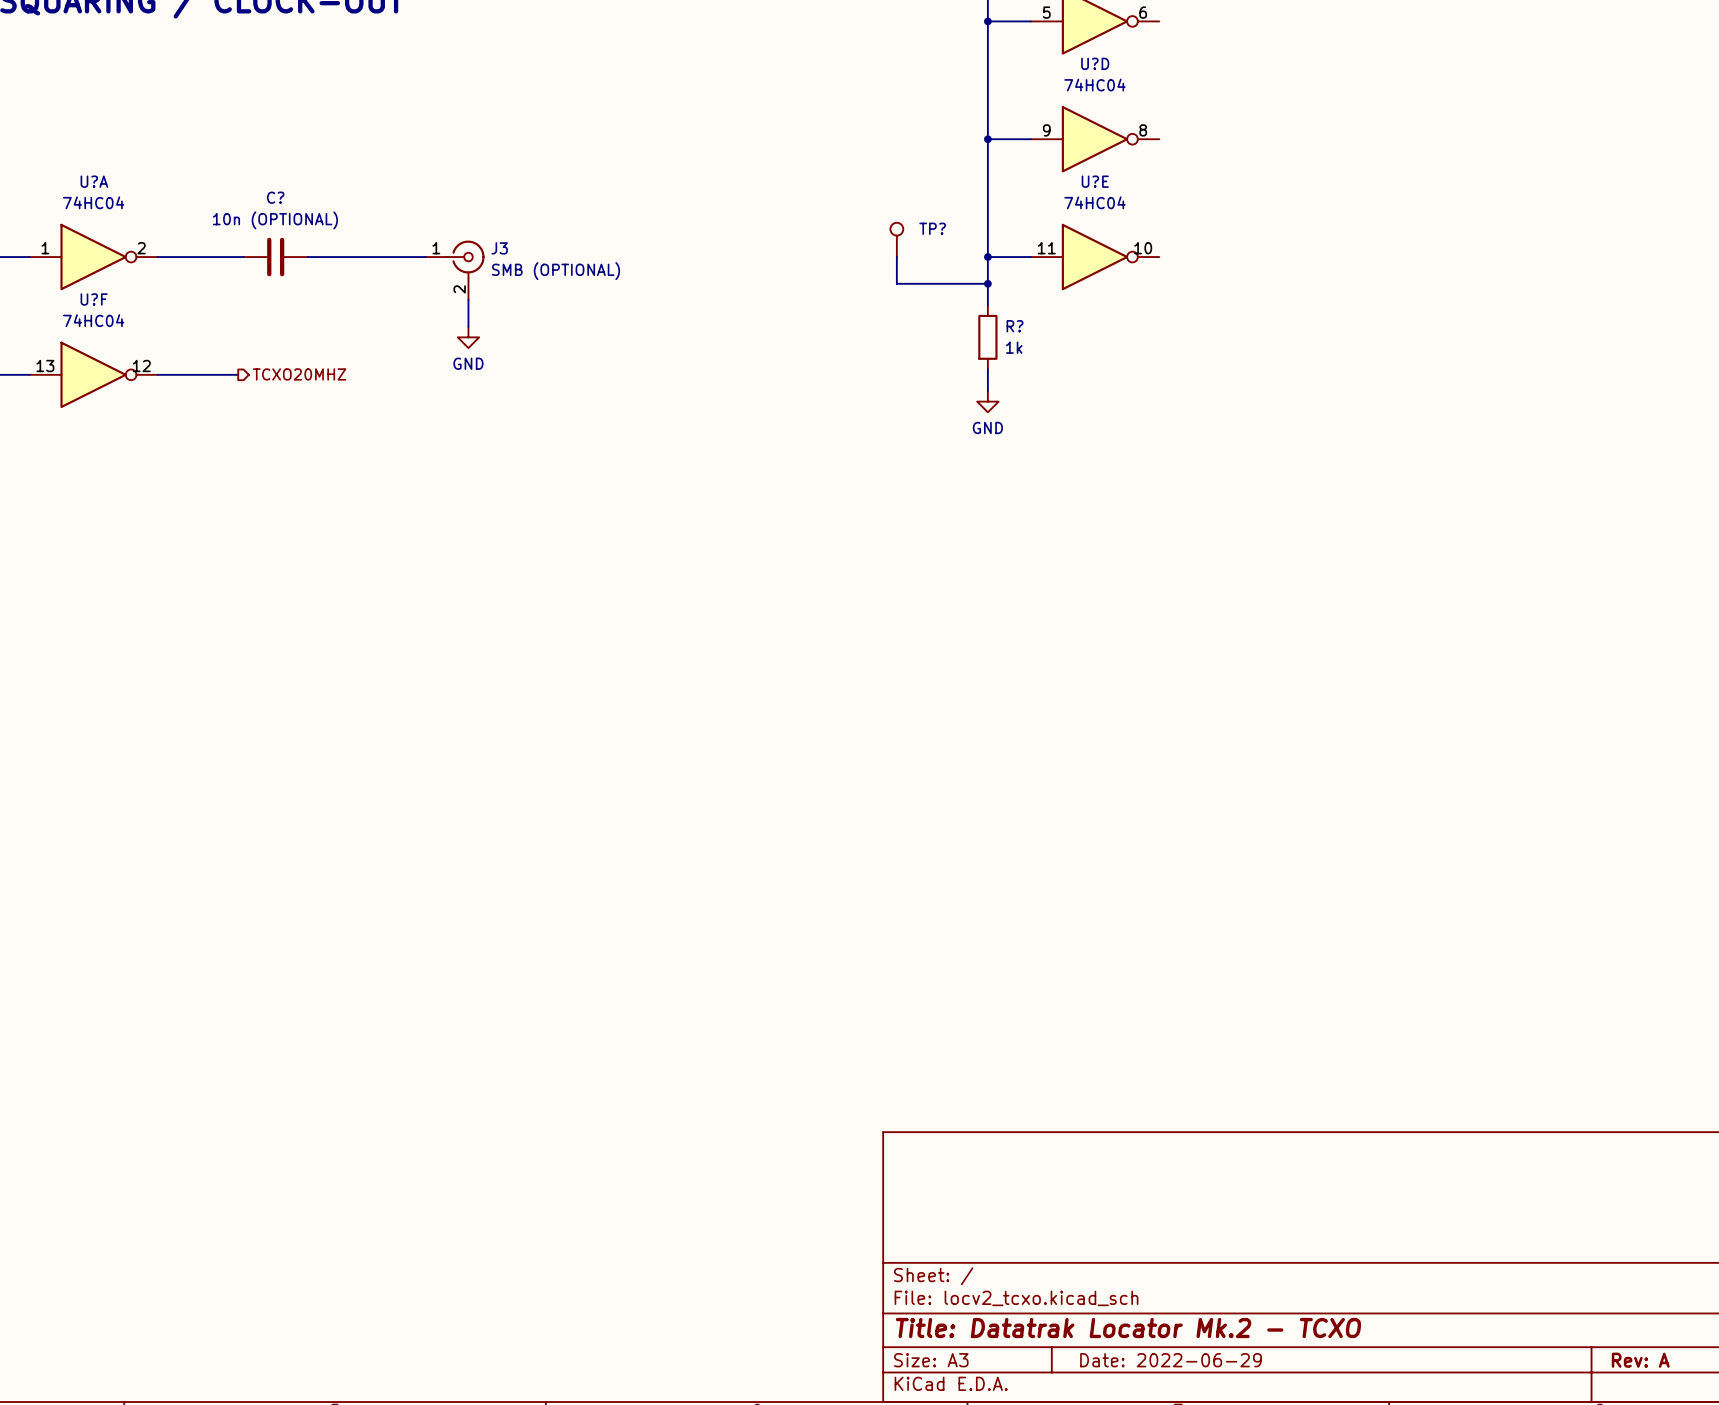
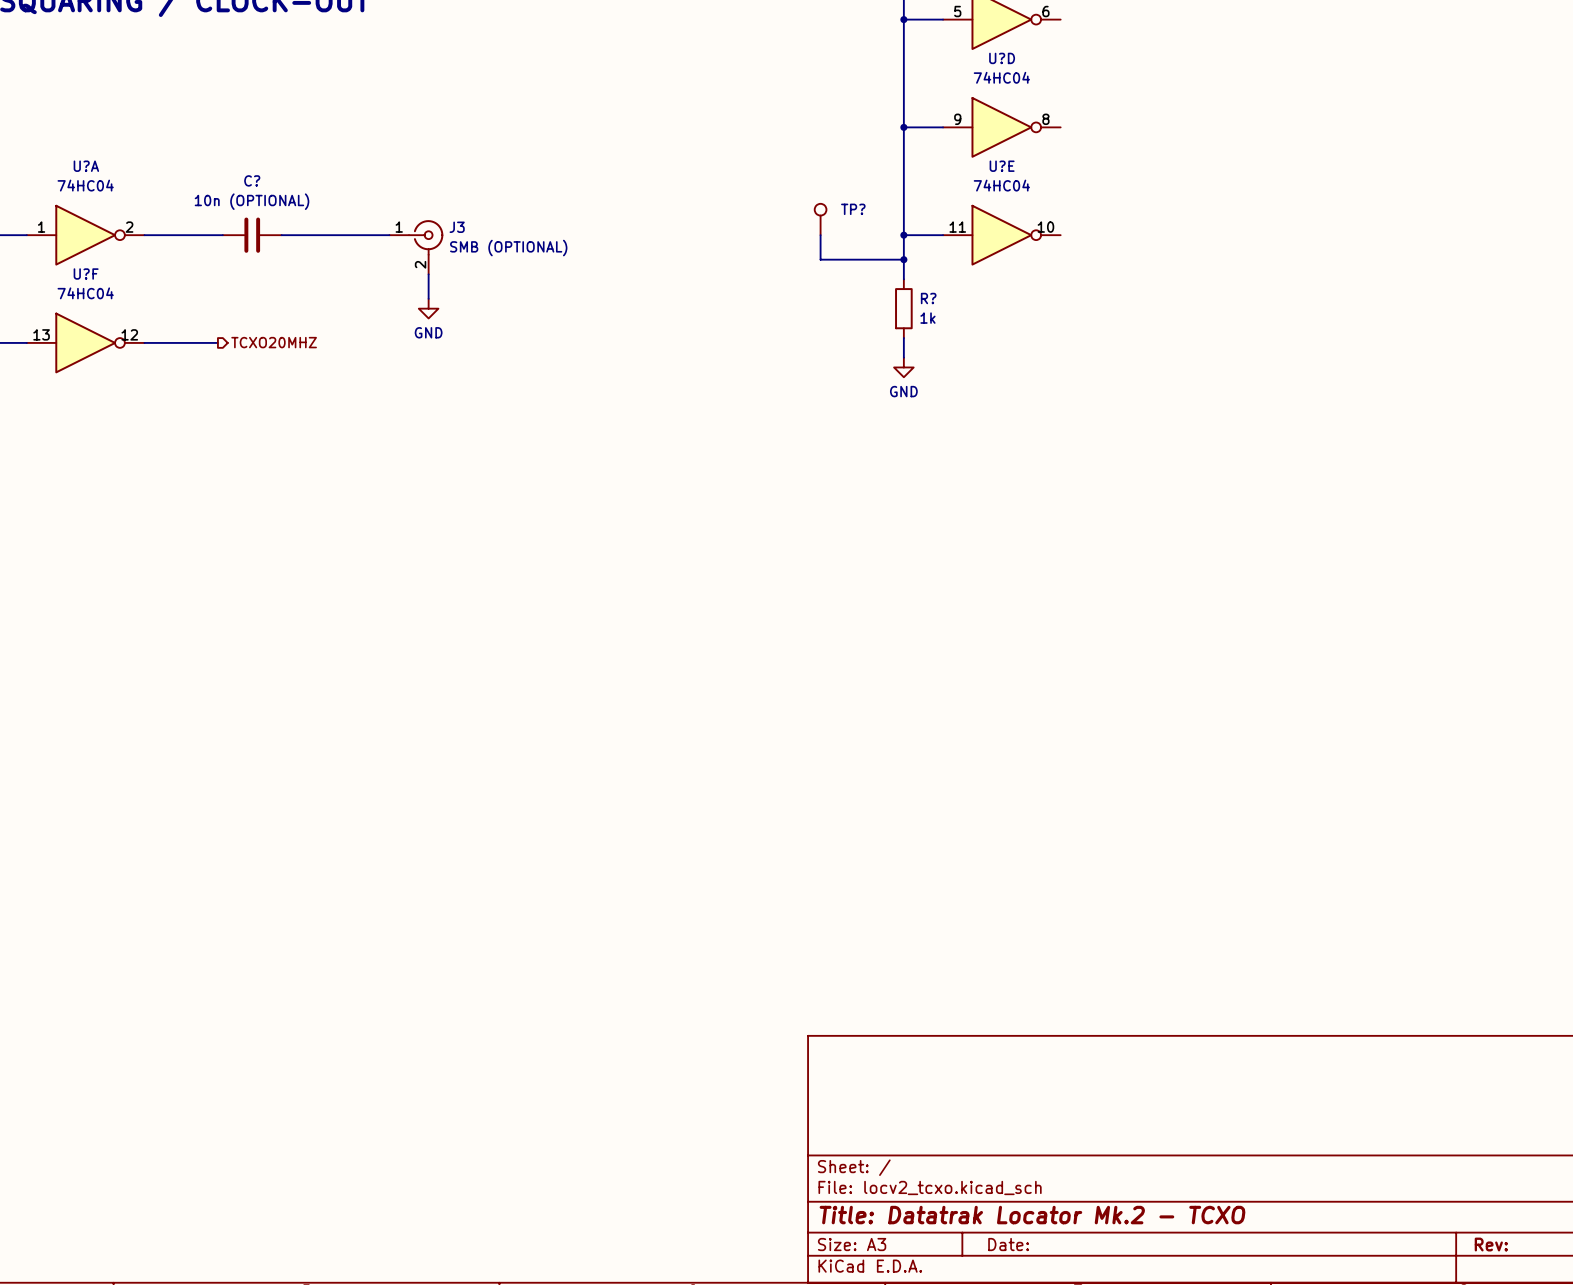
title block: Date: 2022-06-29 (1171, 1360) -> Date: (1008, 1244)
title block: Rev: A (1640, 1360) -> Rev: (1491, 1244)

